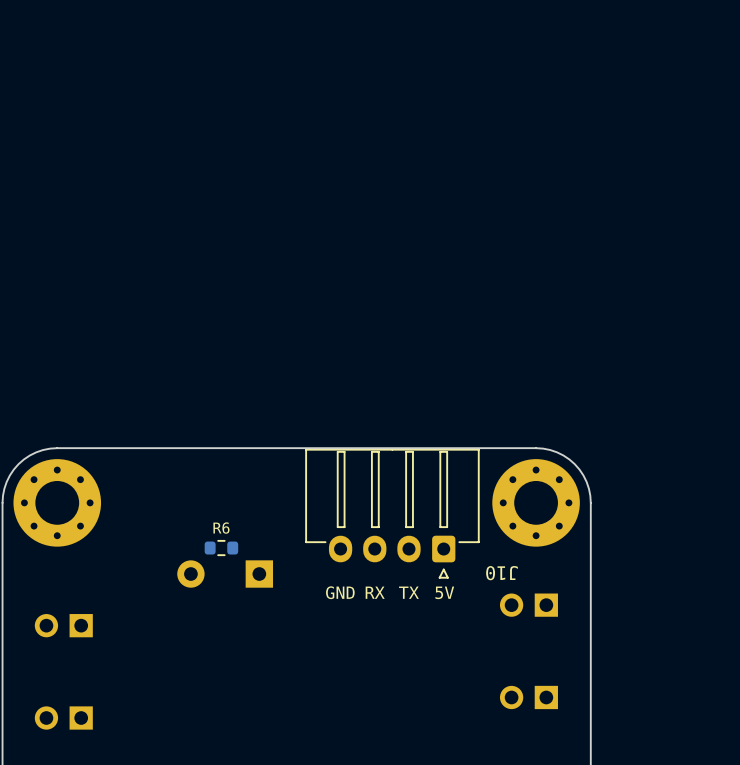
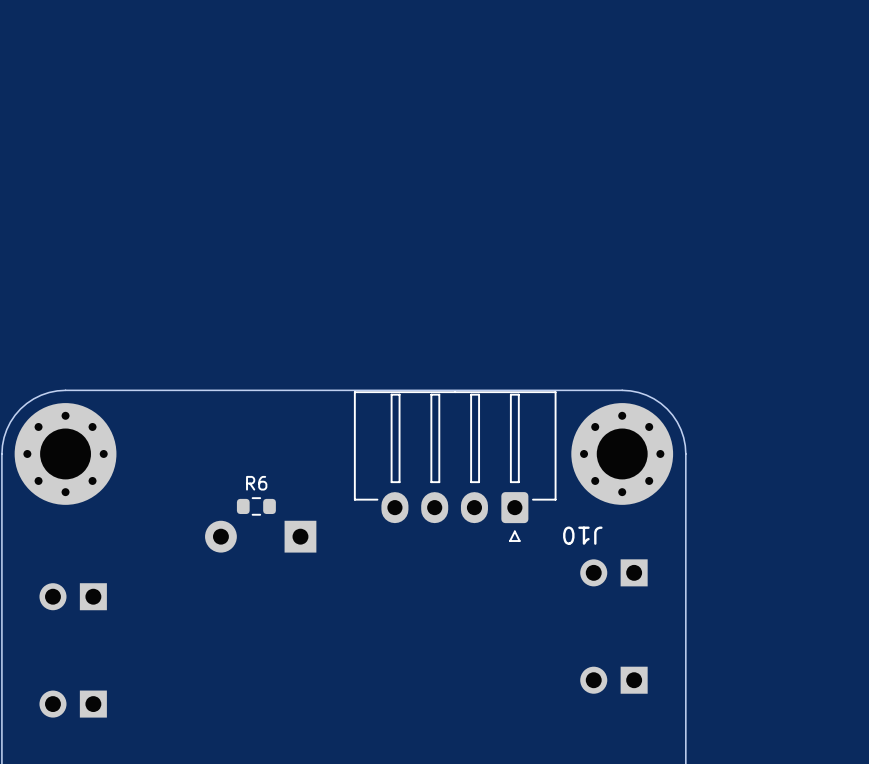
text: GND (340, 592) -> none
text: RX (375, 592) -> none
text: TX (408, 592) -> none
text: 5V (444, 592) -> none

